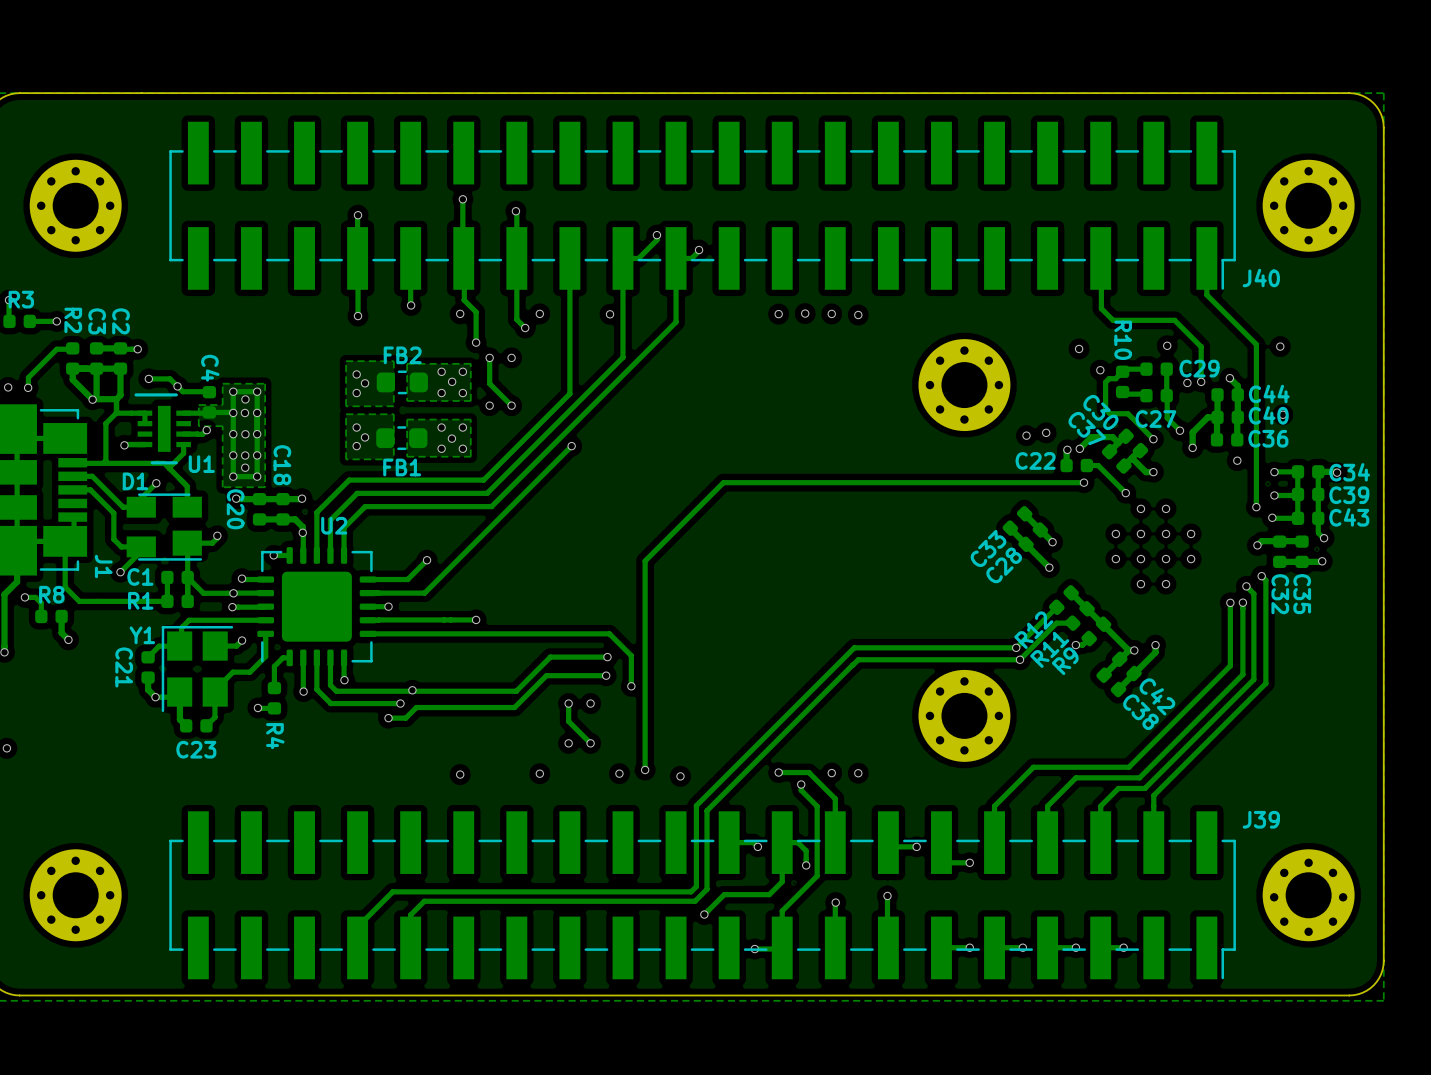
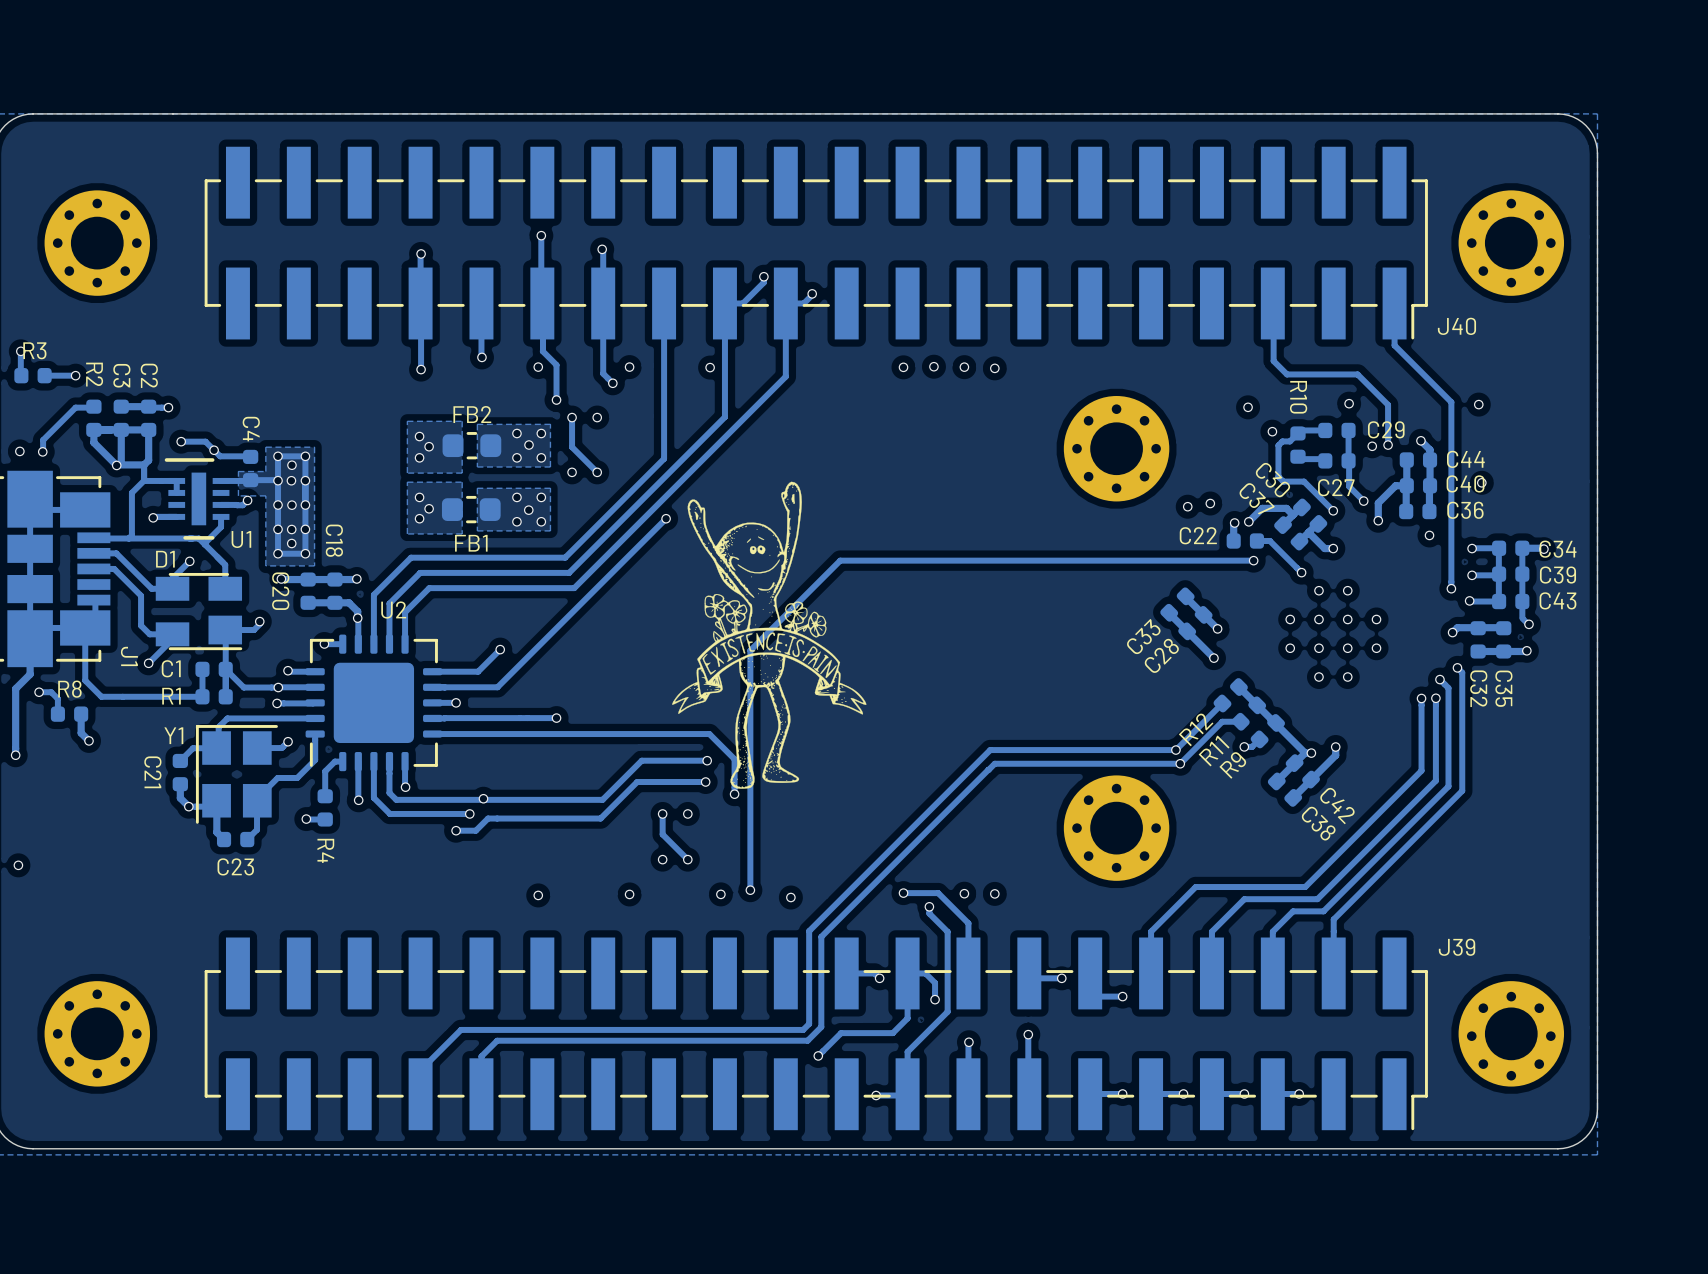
drawing: none -> [672, 481, 867, 789]

